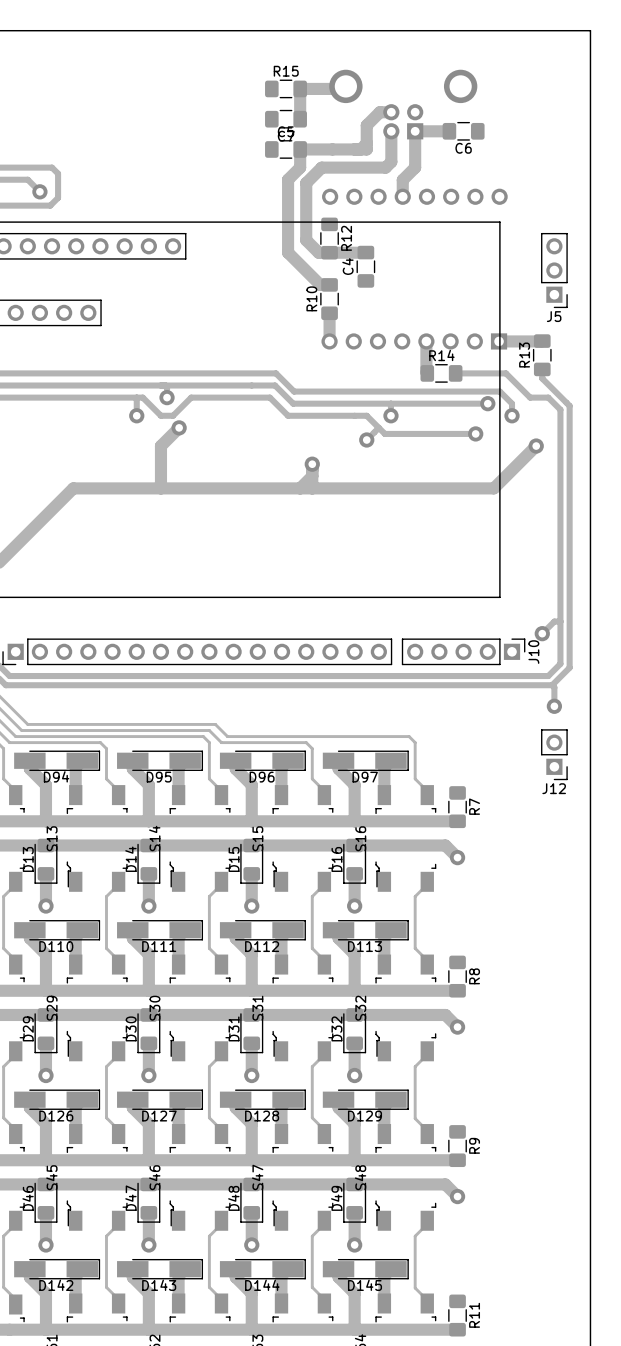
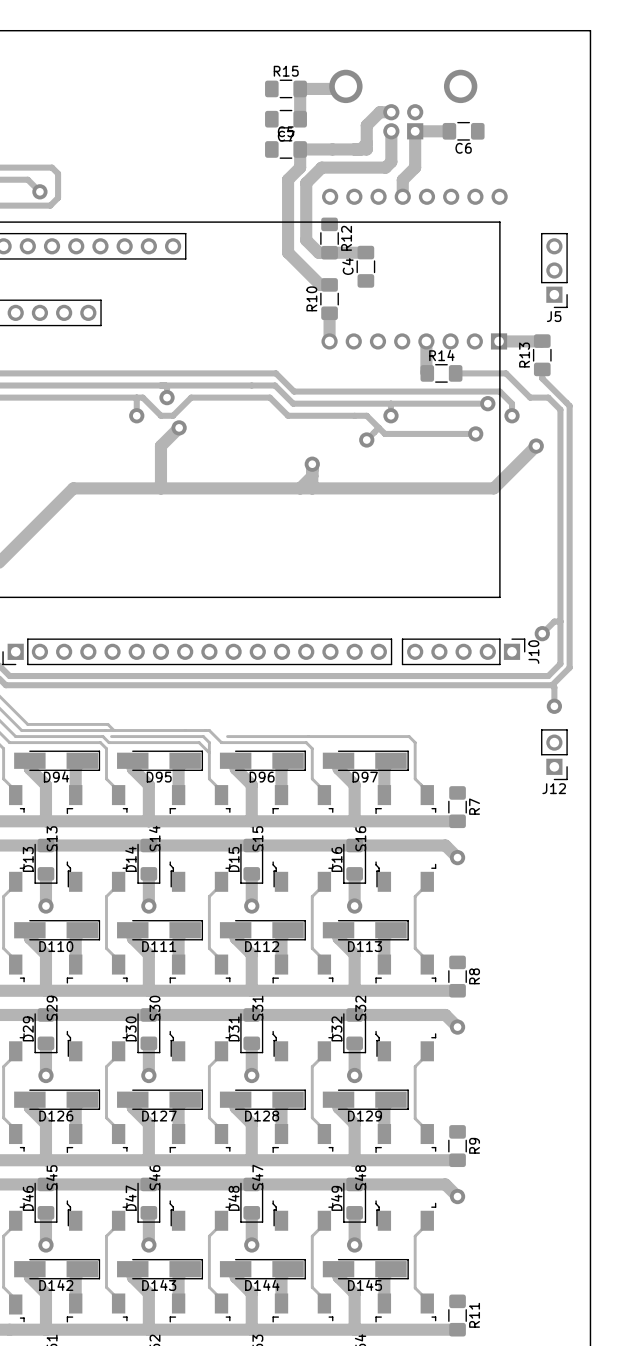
track: (107, 724) (215, 724) (227, 736) -> (107, 724) (114, 730)
track: (102, 736) (111, 736) -> (102, 736) (109, 742) (199, 742) (209, 752)

